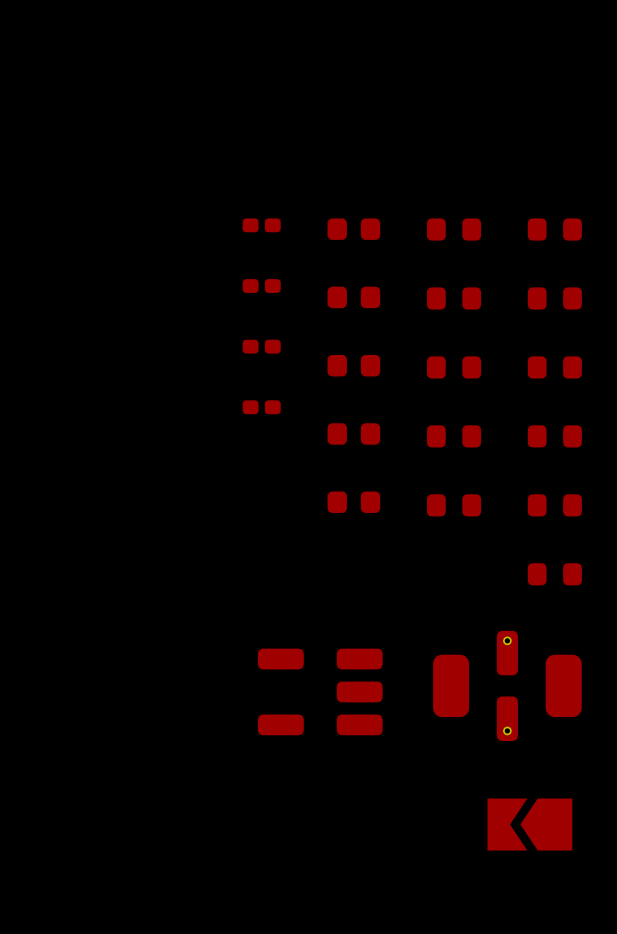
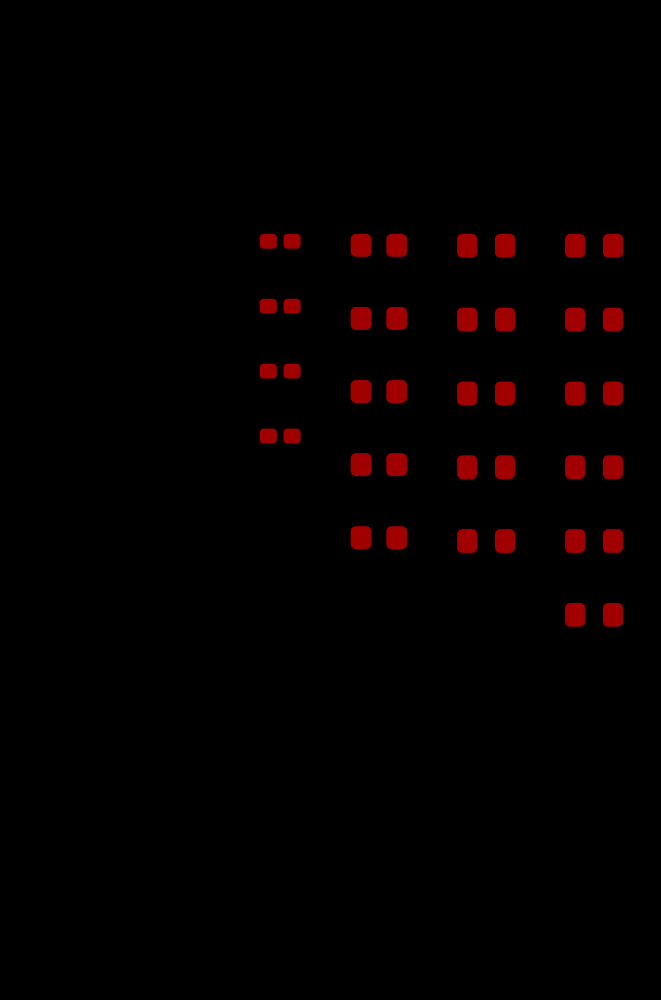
part: (507, 685) -> none
part: (320, 691) -> none
part: (529, 824) -> none

